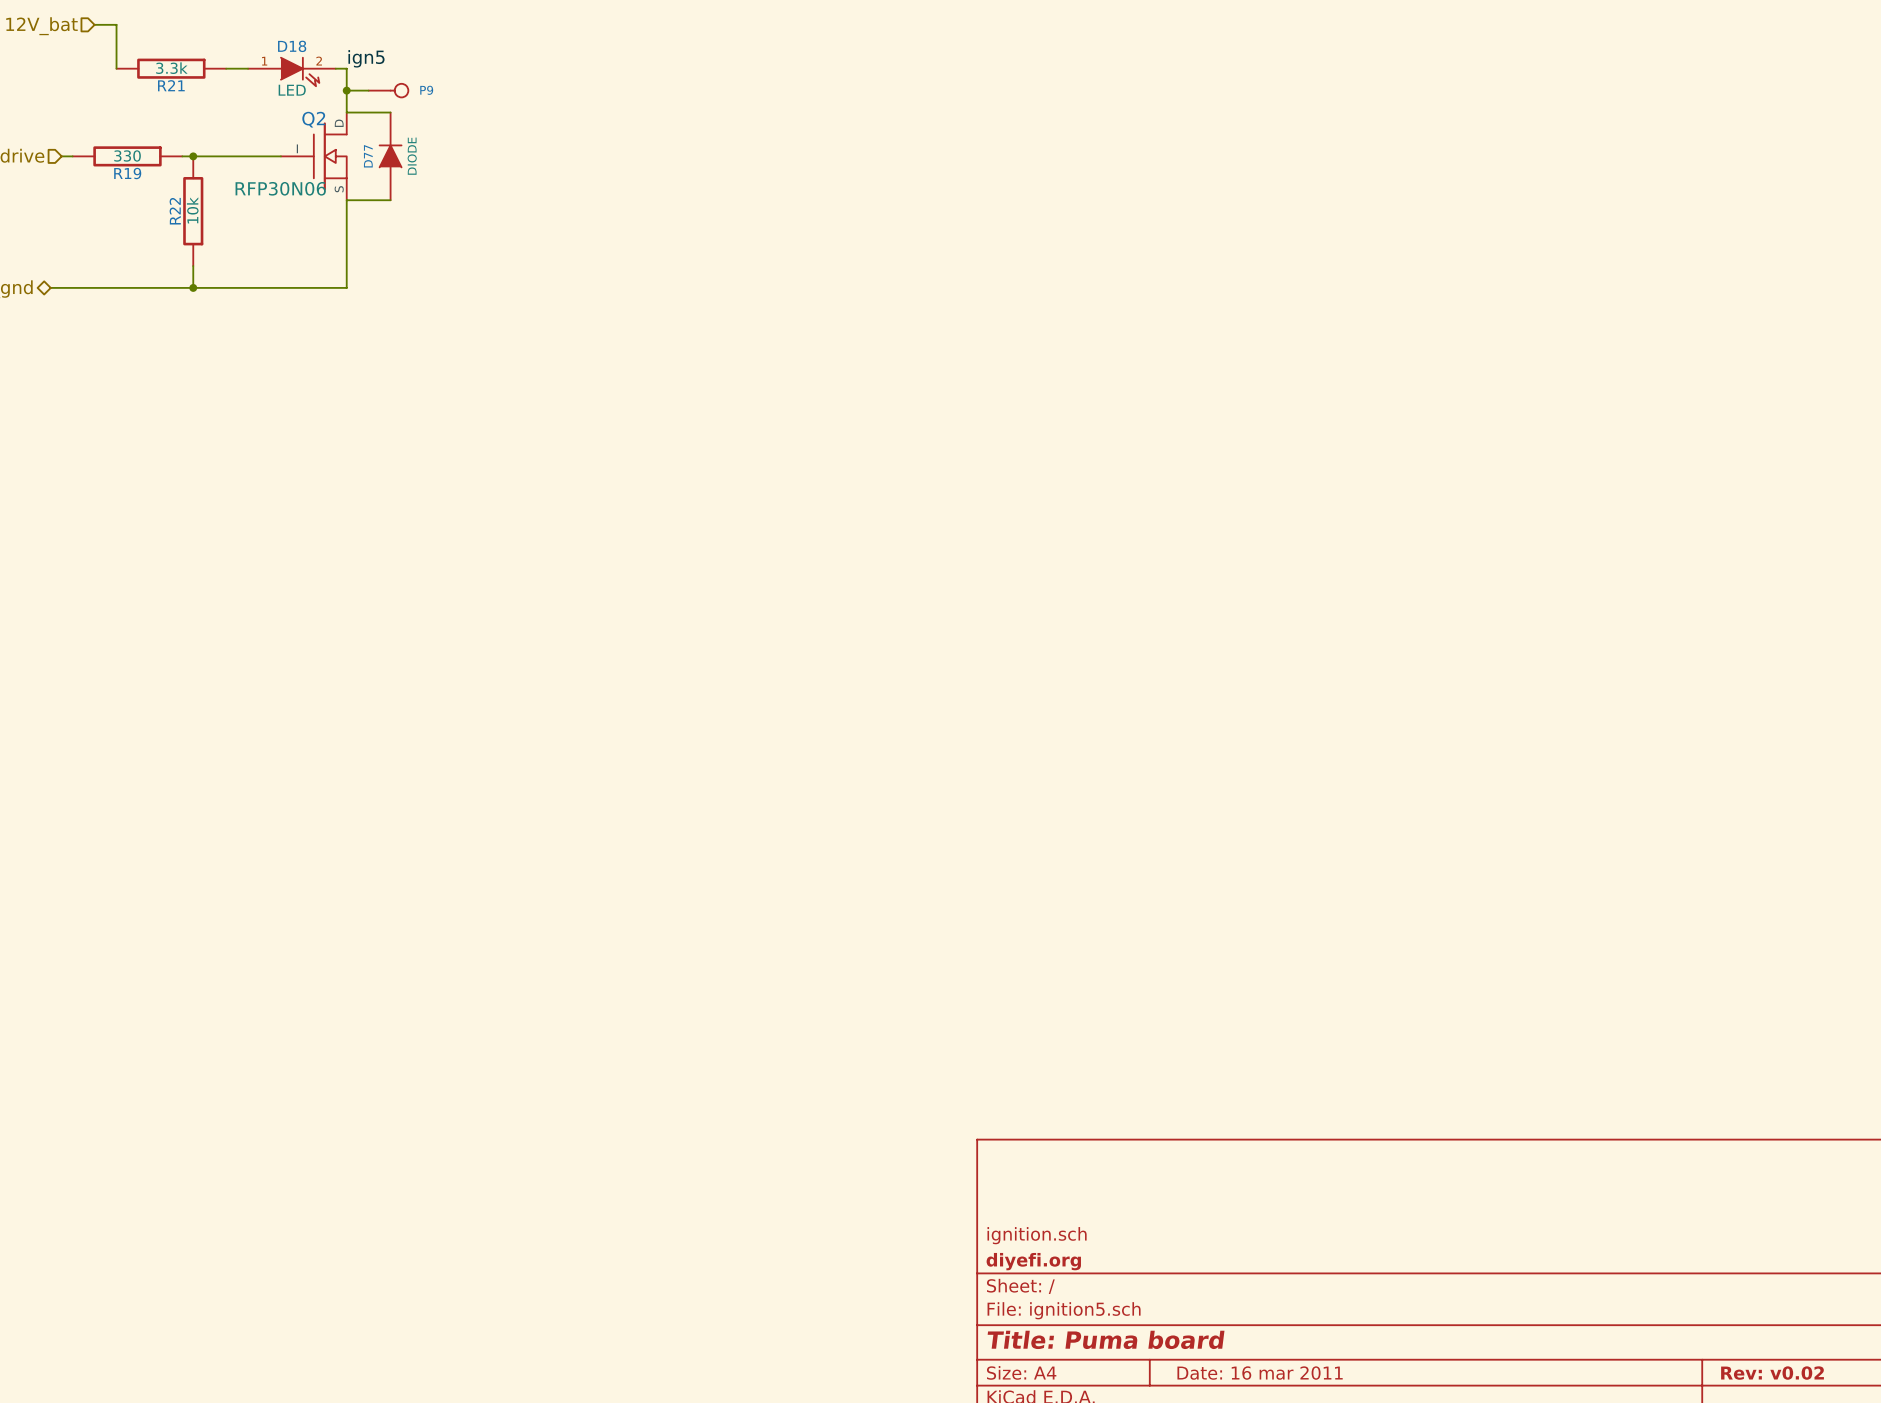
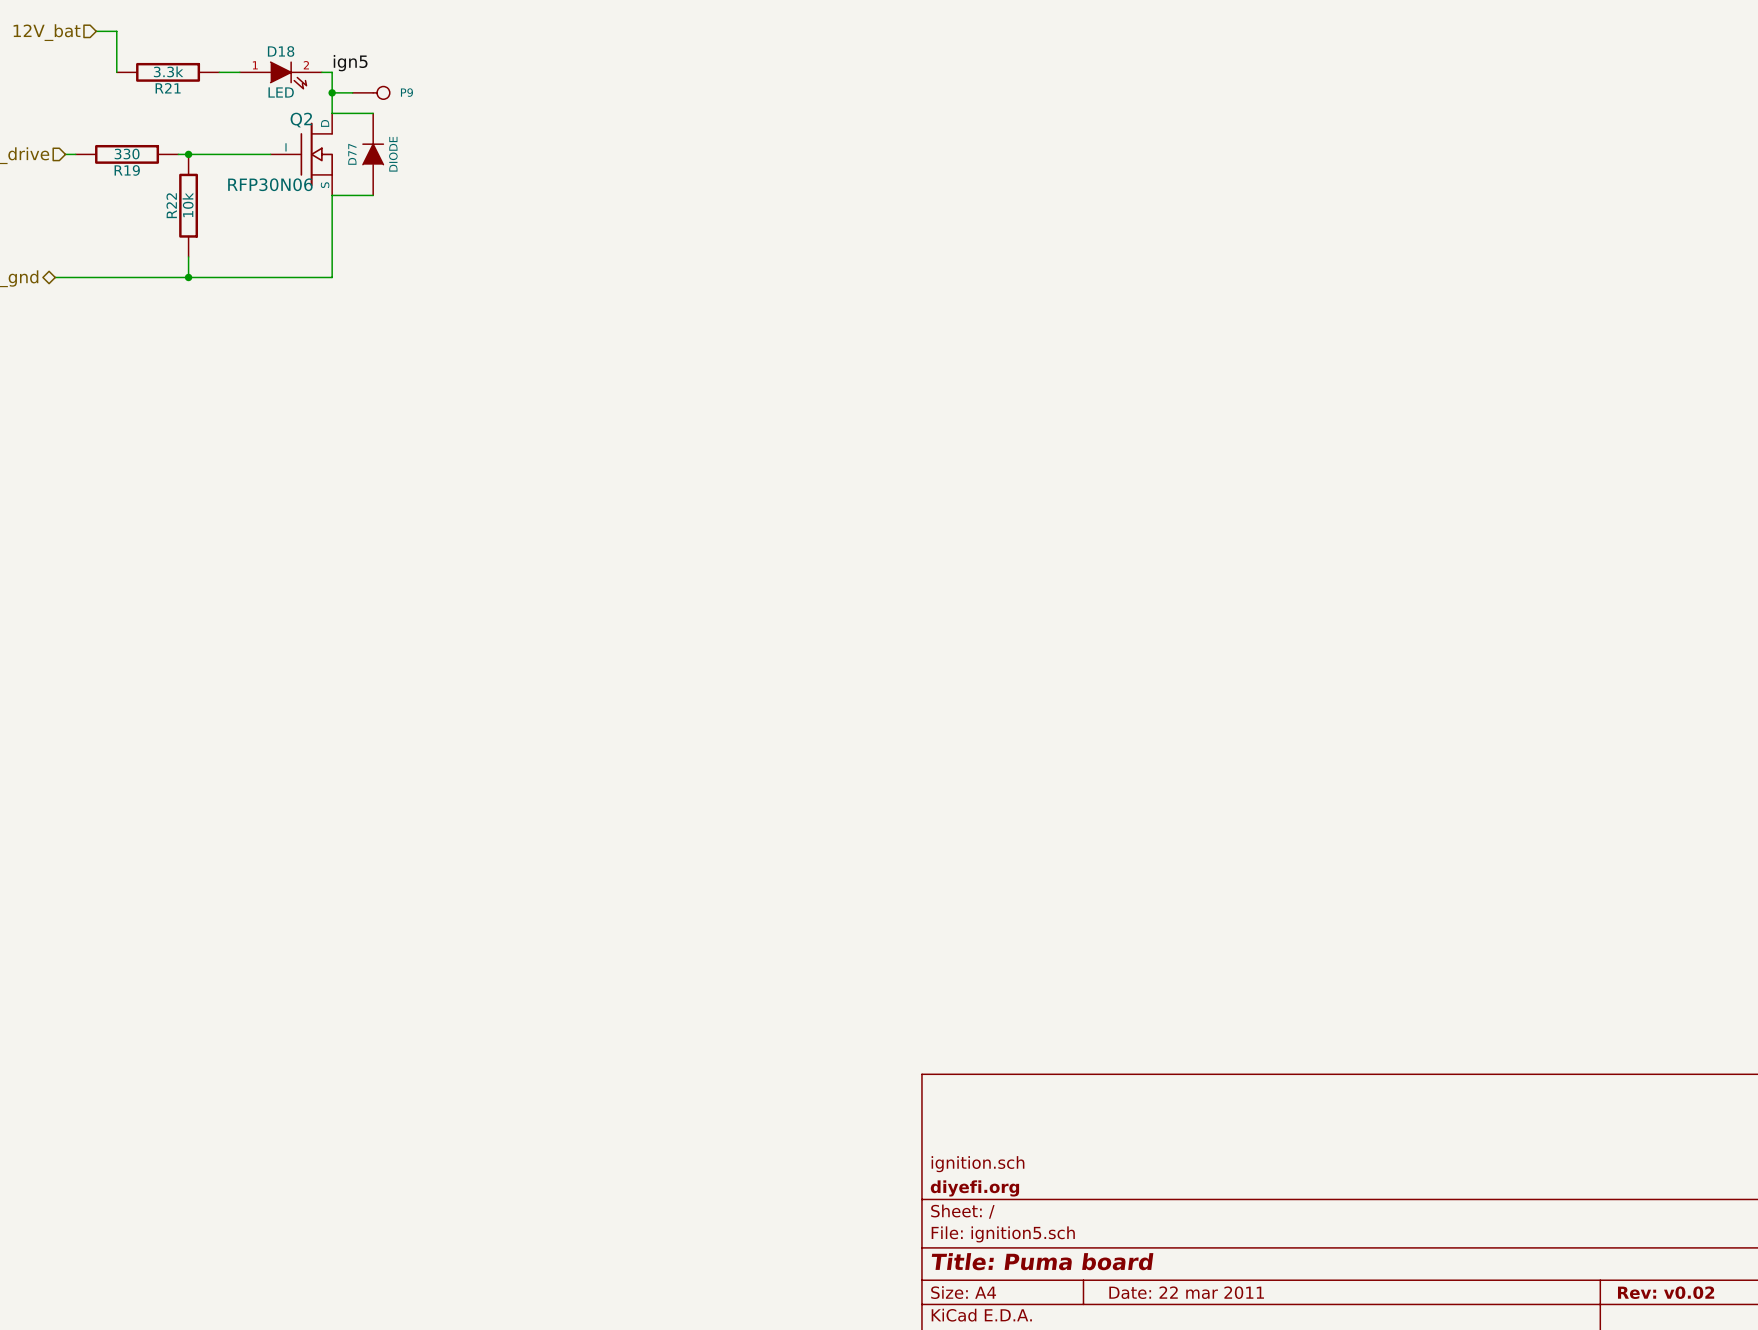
title block: Date: 16 mar 2011 (1260, 1373) -> Date: 22 mar 2011 (1186, 1292)

